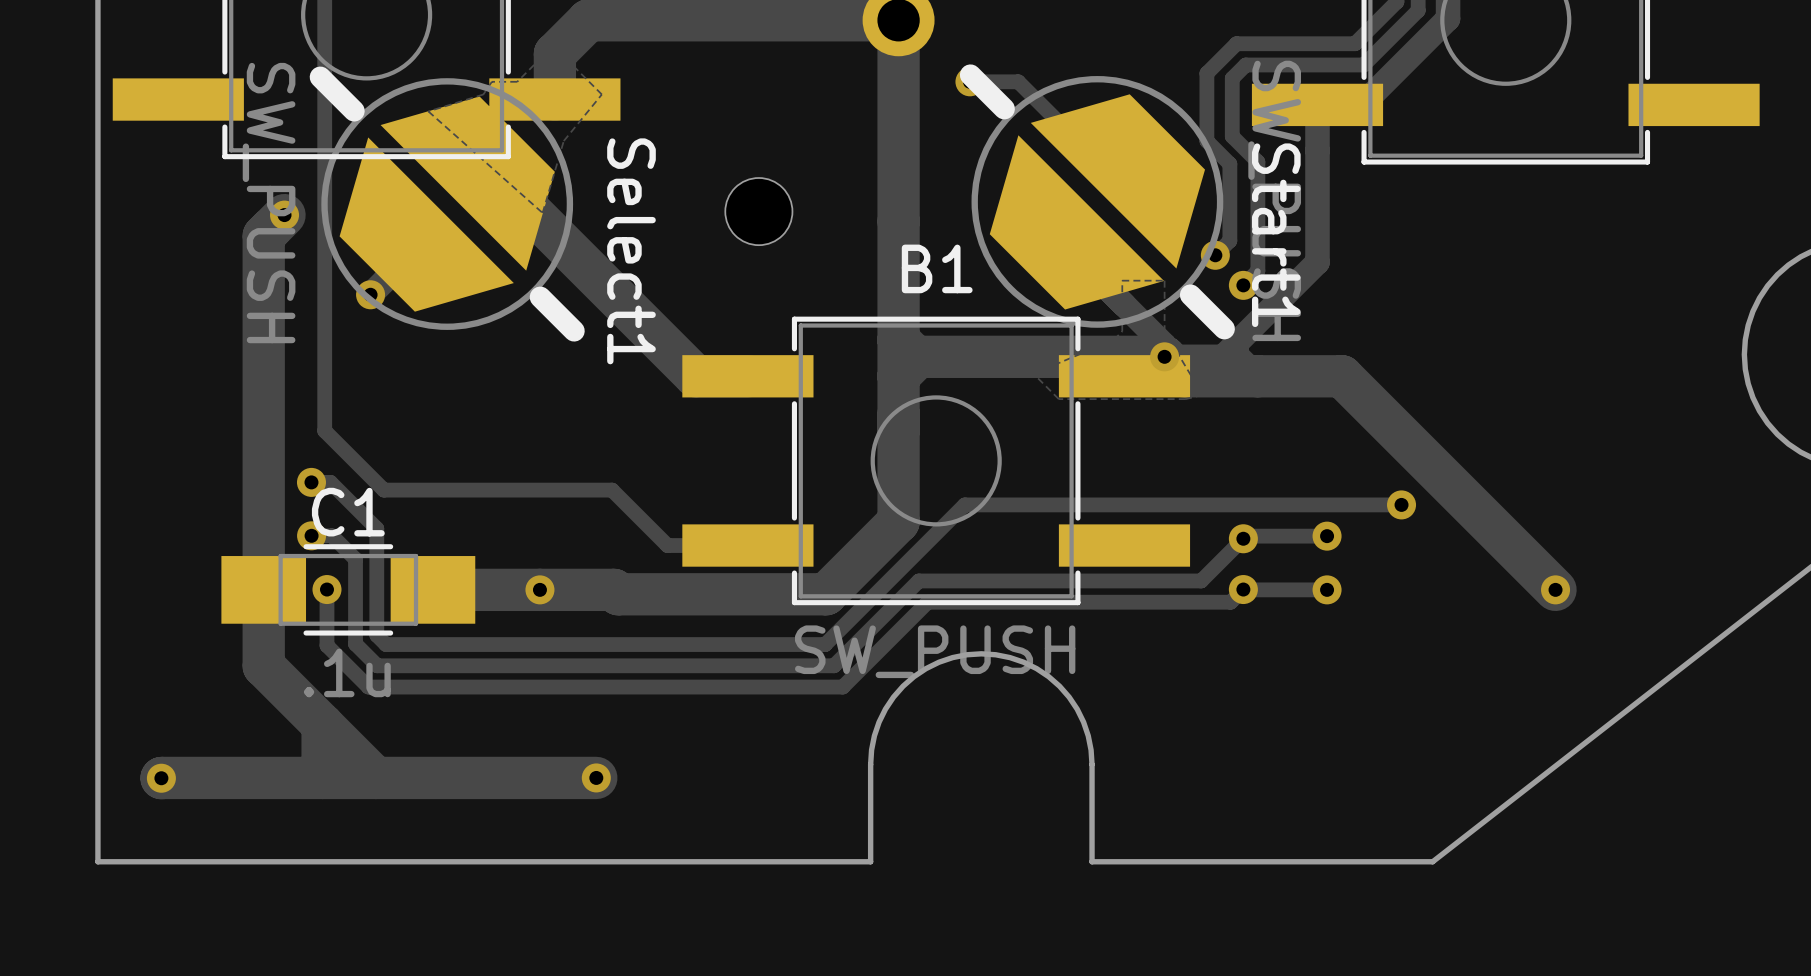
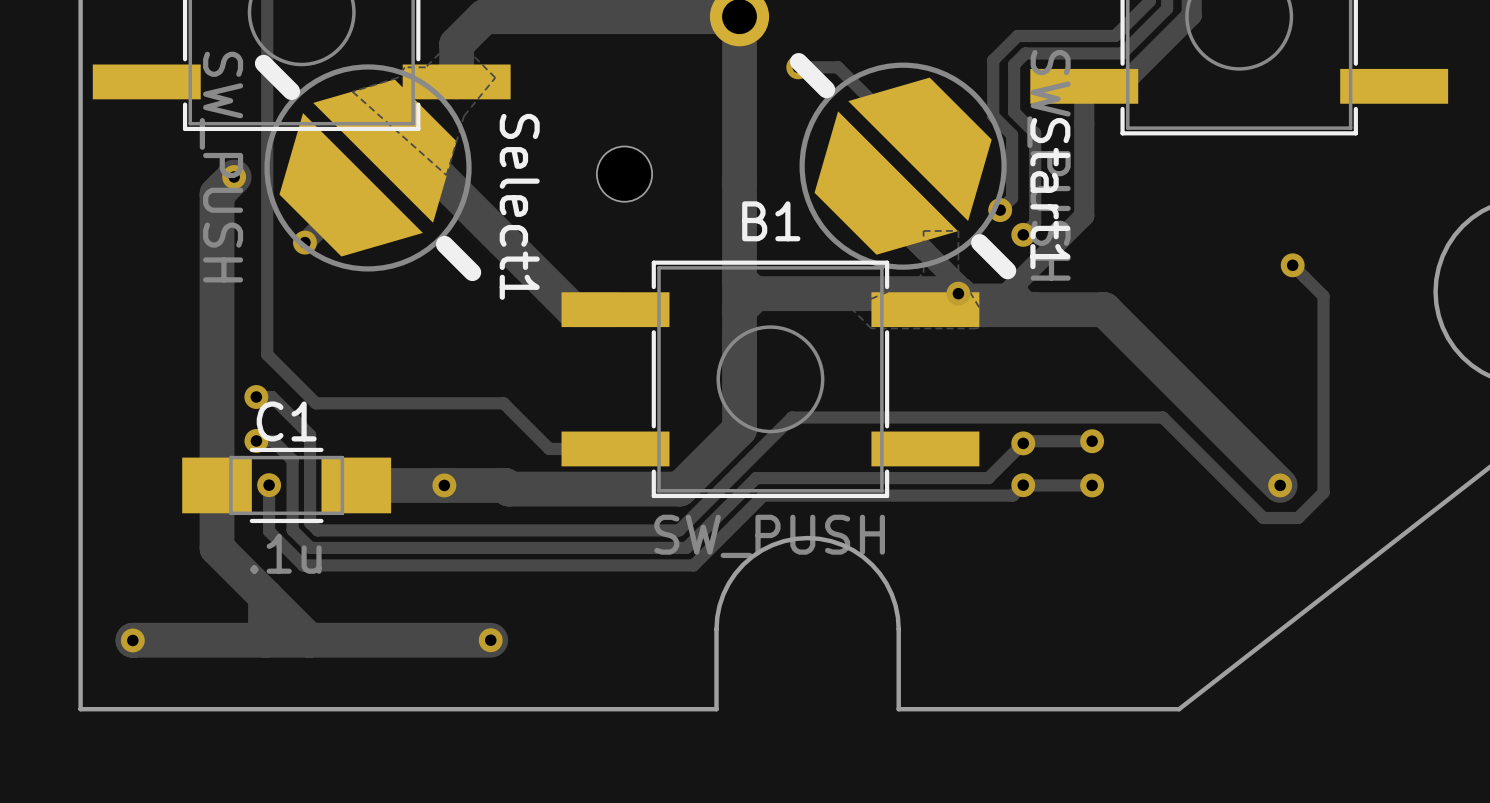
track: (1401, 504) (964, 504) (962, 507) -> (1292, 265) (1323, 296) (1323, 492) (1298, 518) (1263, 518) (1162, 417) (792, 417)
via position: (1401, 504) -> (1292, 265)

